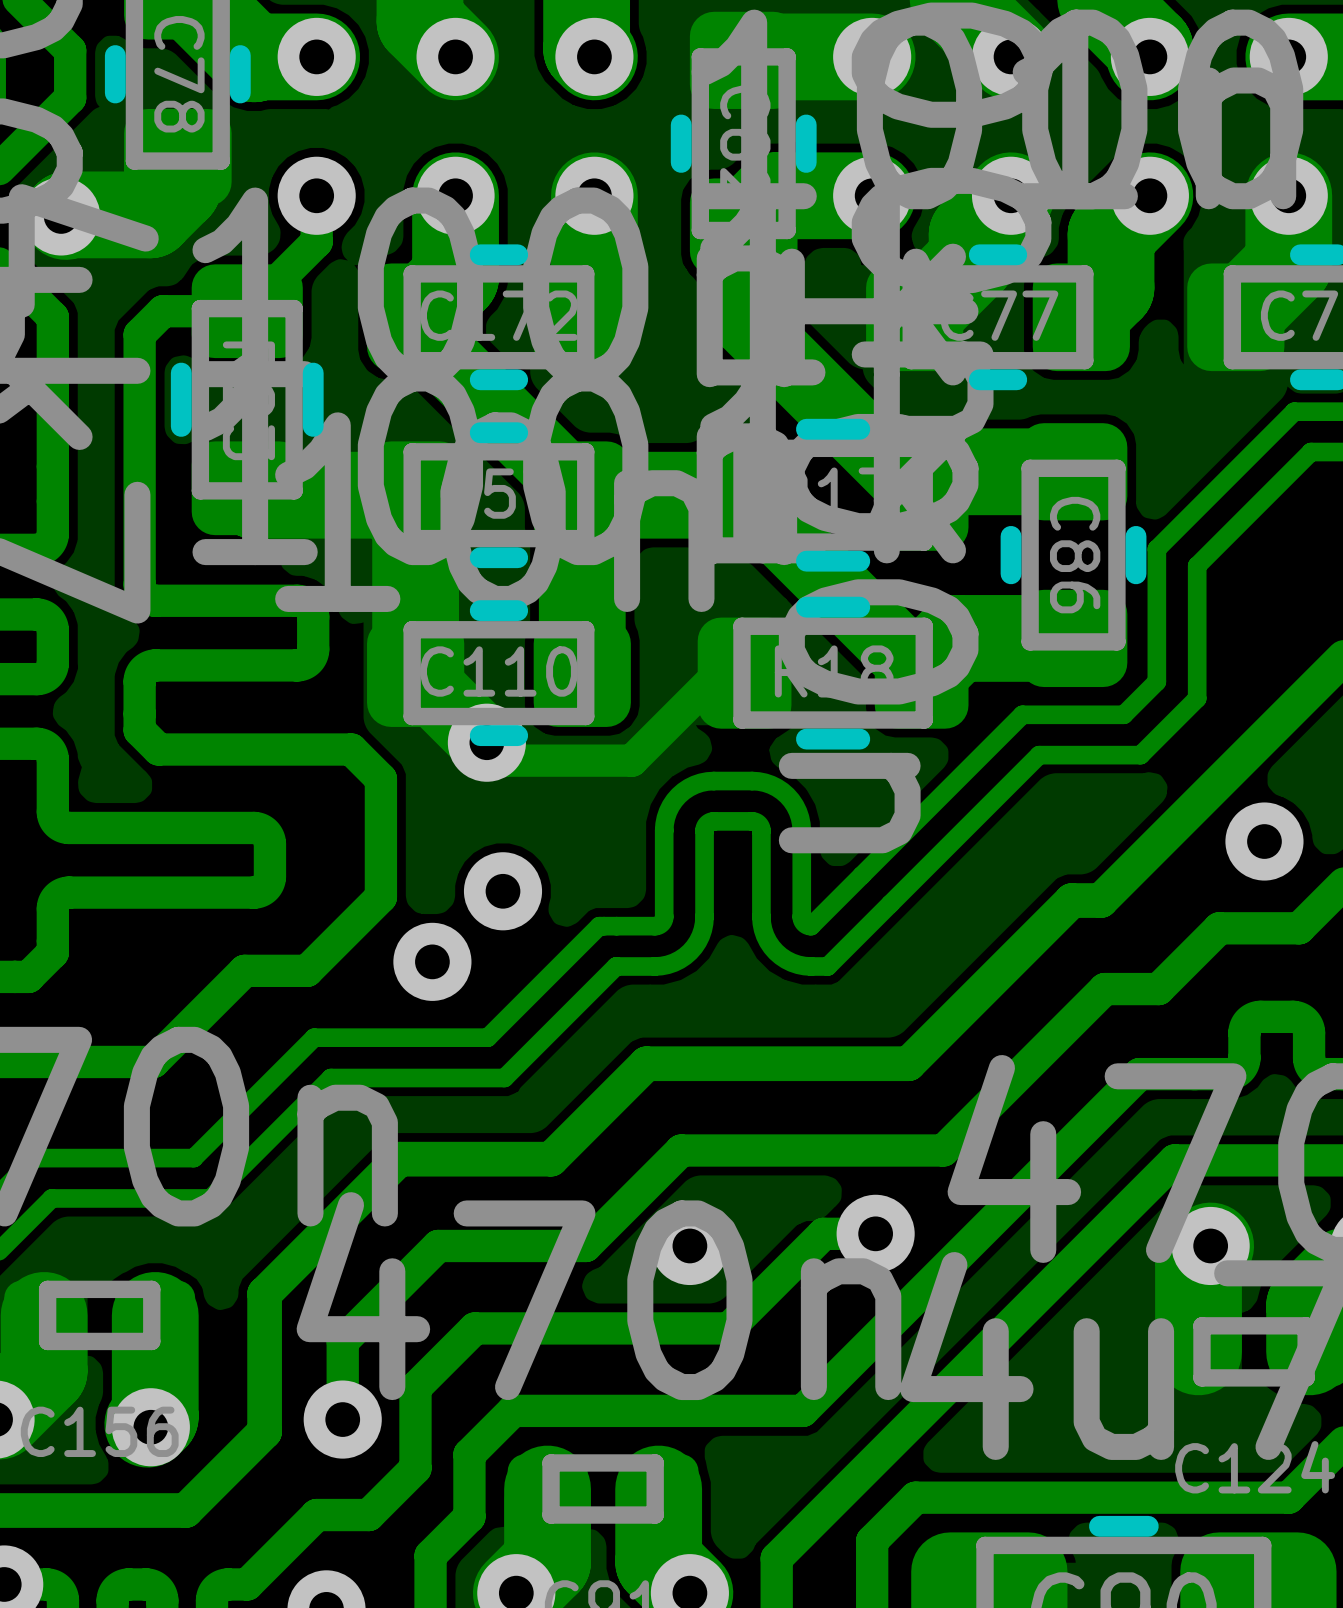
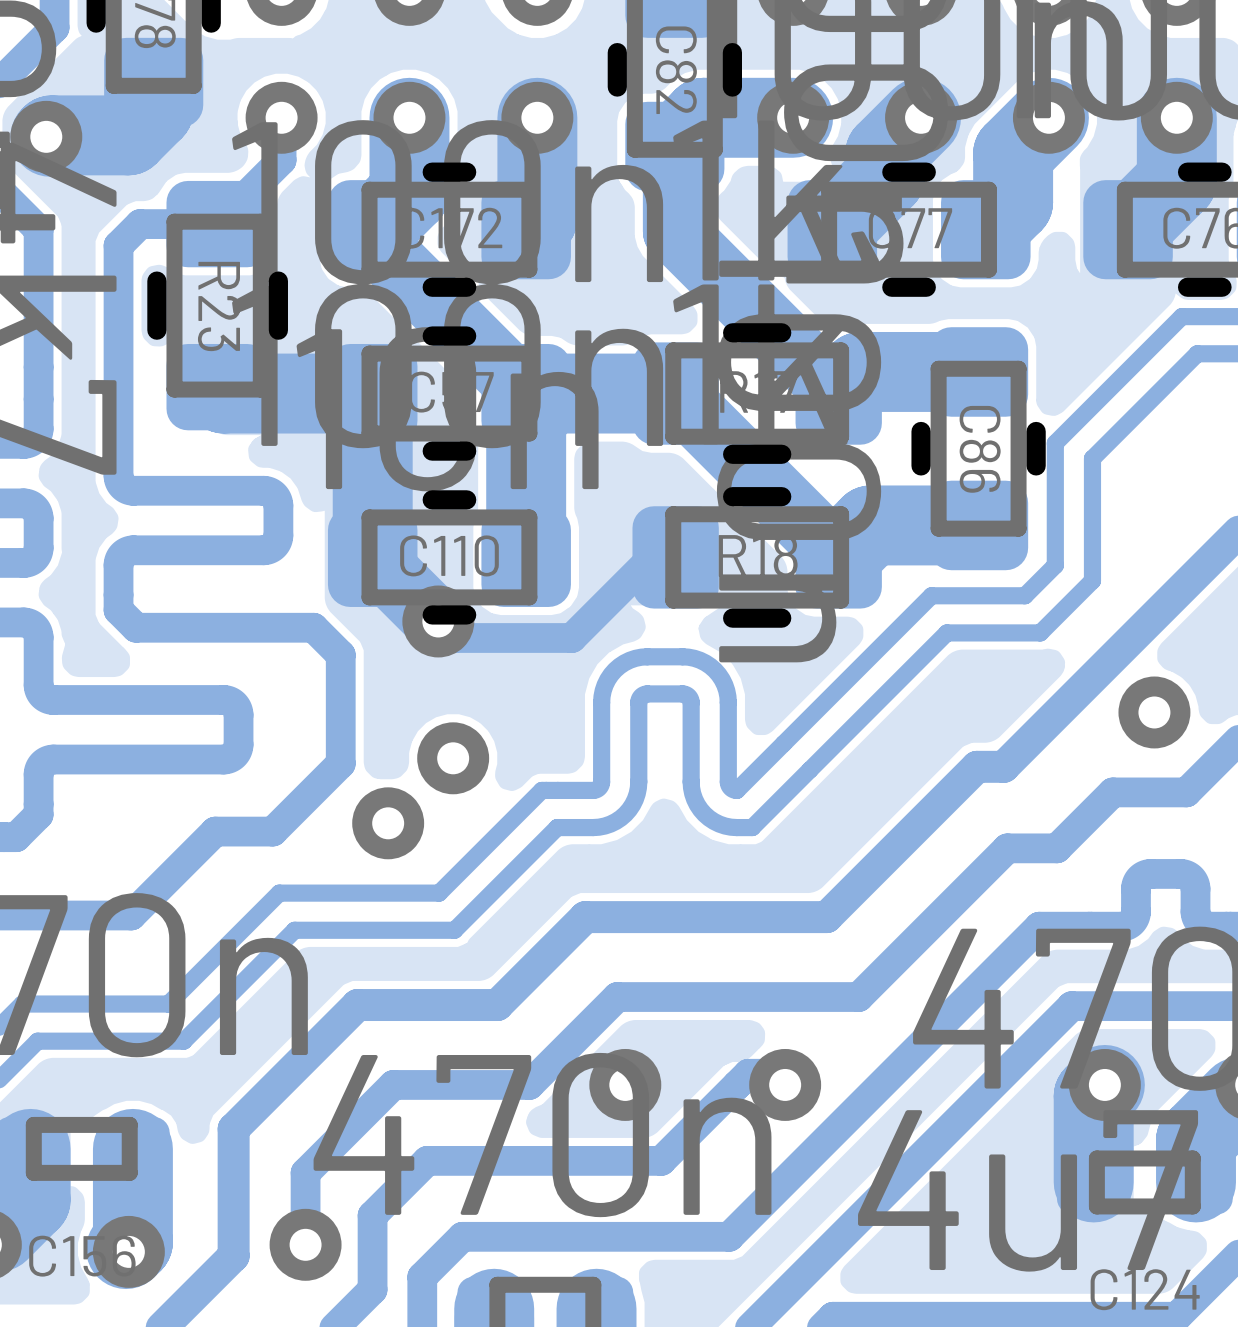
via position: (875, 1233) -> (785, 1084)

